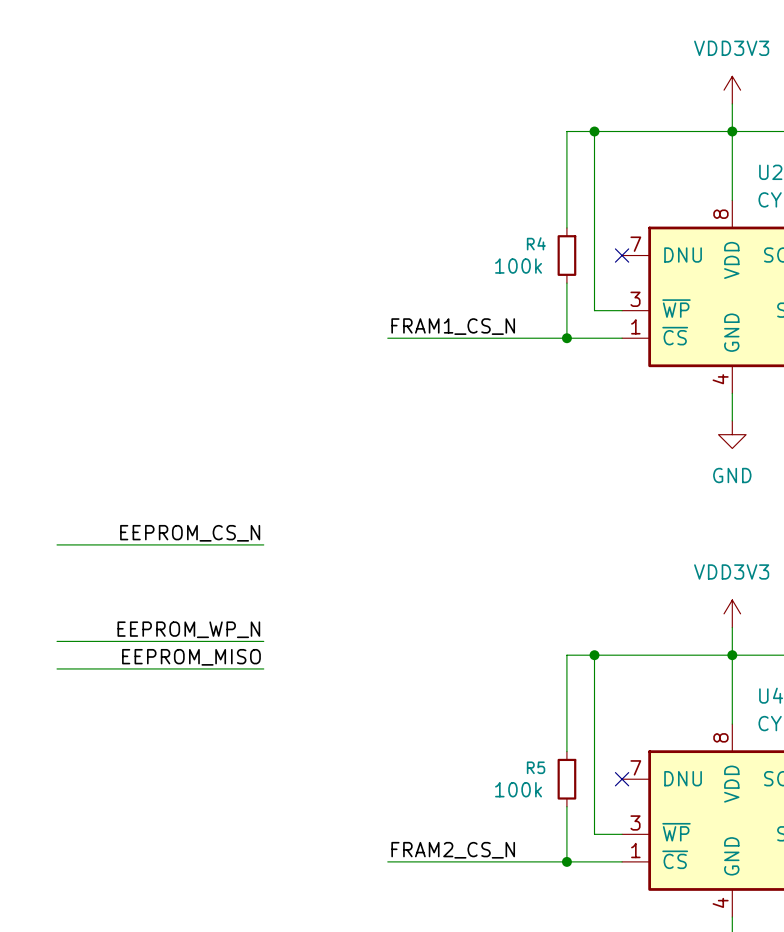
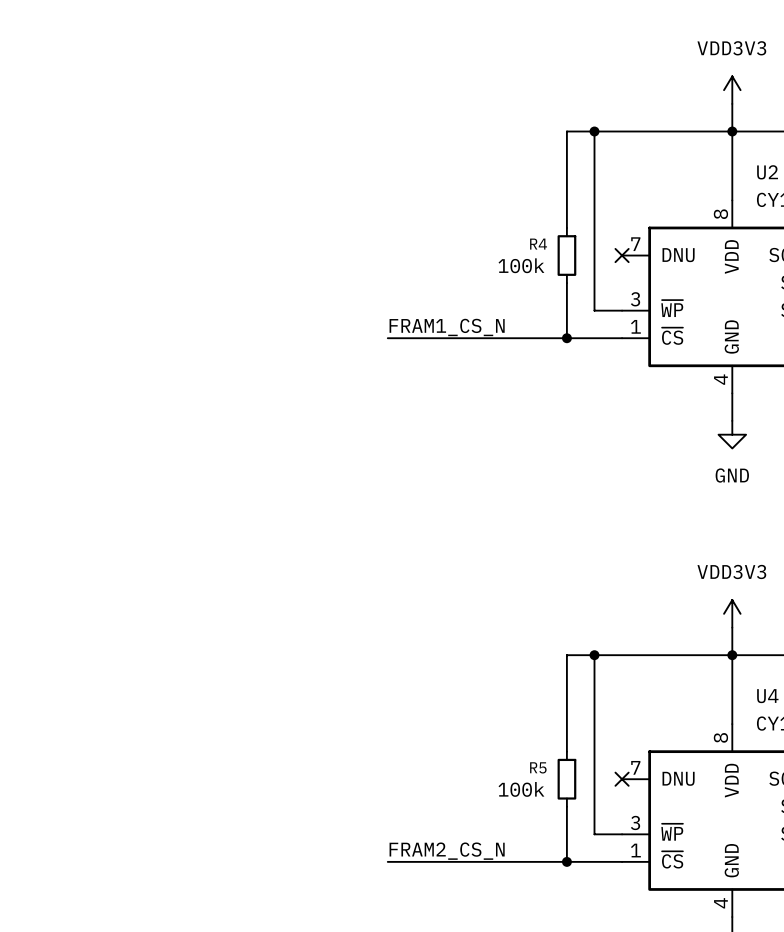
label: EEPROM_CS_N (190, 533) -> none
wire: (57, 544) (263, 544) -> none
label: EEPROM_WP_N (188, 629) -> none
wire: (57, 641) (263, 641) -> none
label: EEPROM_MISO (191, 657) -> none
wire: (57, 668) (263, 668) -> none

